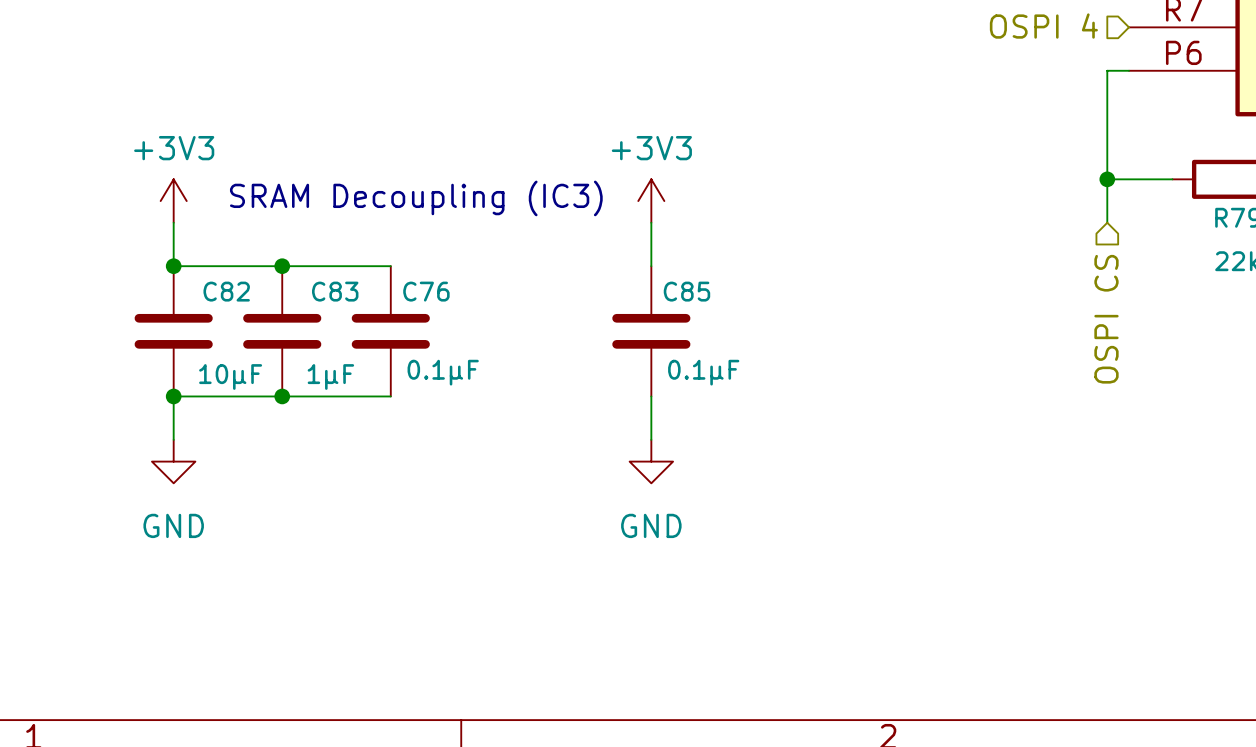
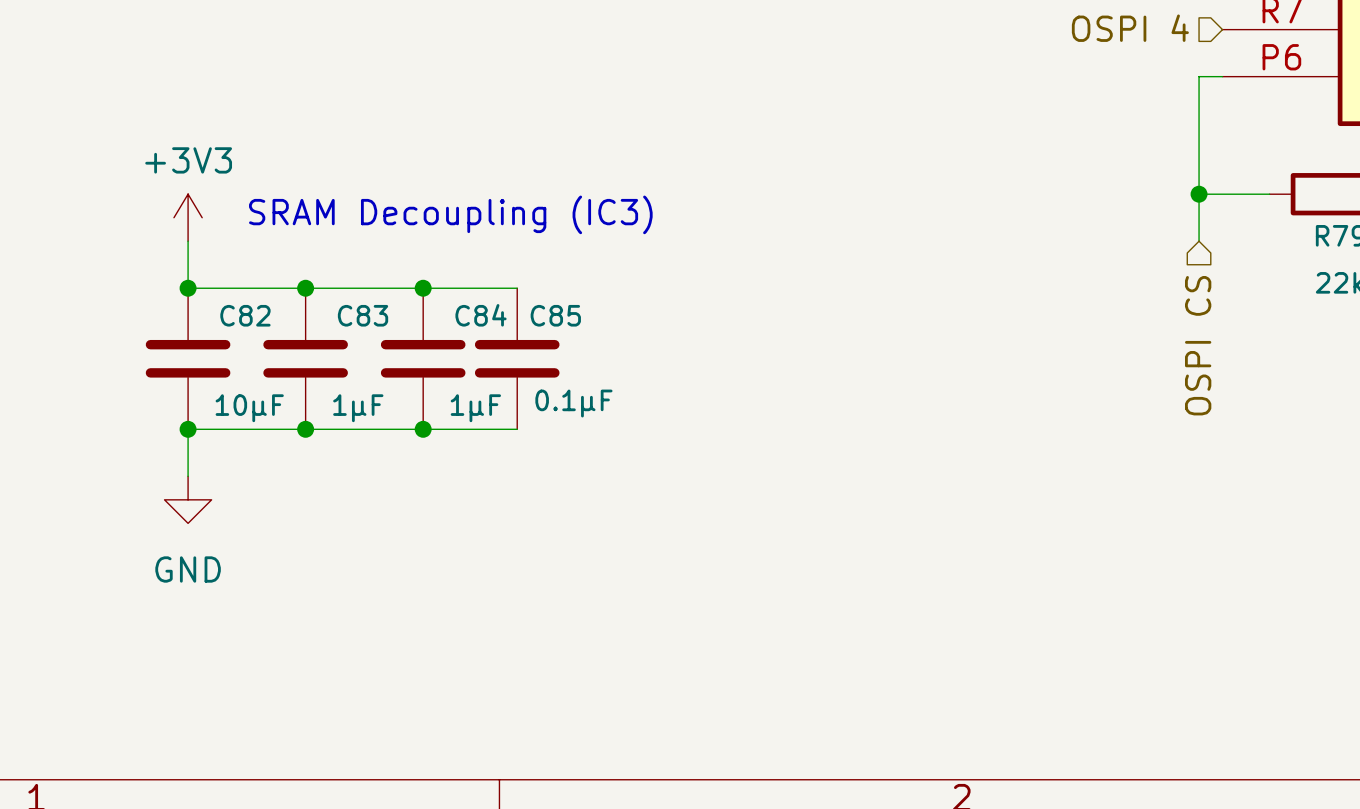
power symbol: +3V3 (651, 201) -> none
wire: (651, 222) (651, 266) -> none
wire: none -> (423, 288) (517, 288)
junction: none -> (423, 288)
C76 name: C76 (426, 291) -> C84 (481, 315)
C85 position: (651, 331) -> (517, 358)
C76 value: 0.1µF (443, 372) -> 1µF (475, 408)
wire: none -> (423, 429) (517, 429)
junction: none -> (423, 429)
wire: (651, 396) (651, 439) -> none
power symbol: GND (651, 461) -> none

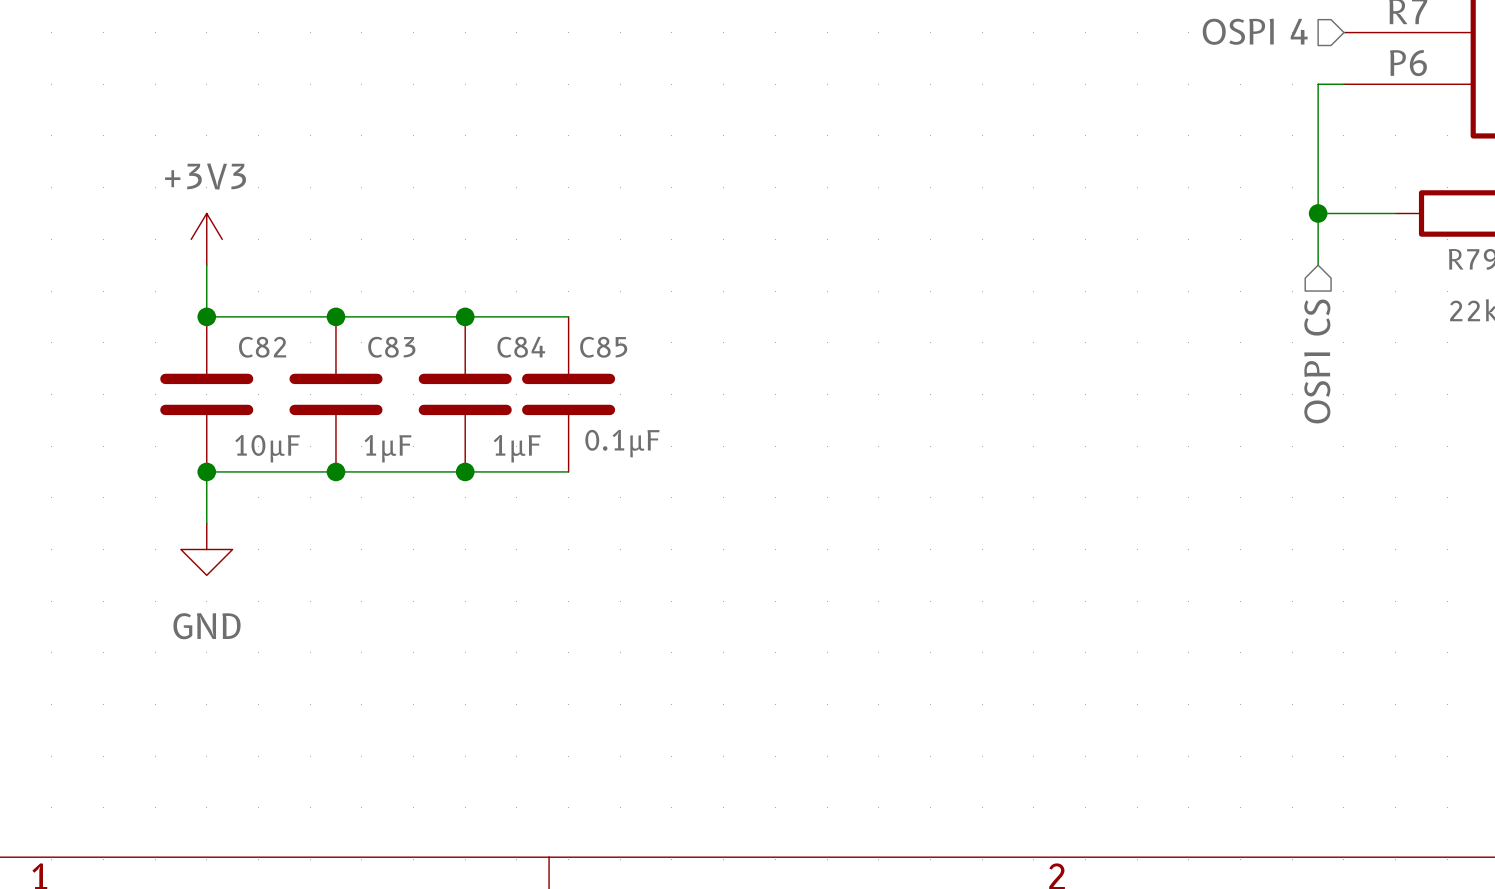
text: SRAM Decoupling (IC3) (450, 214) -> none

